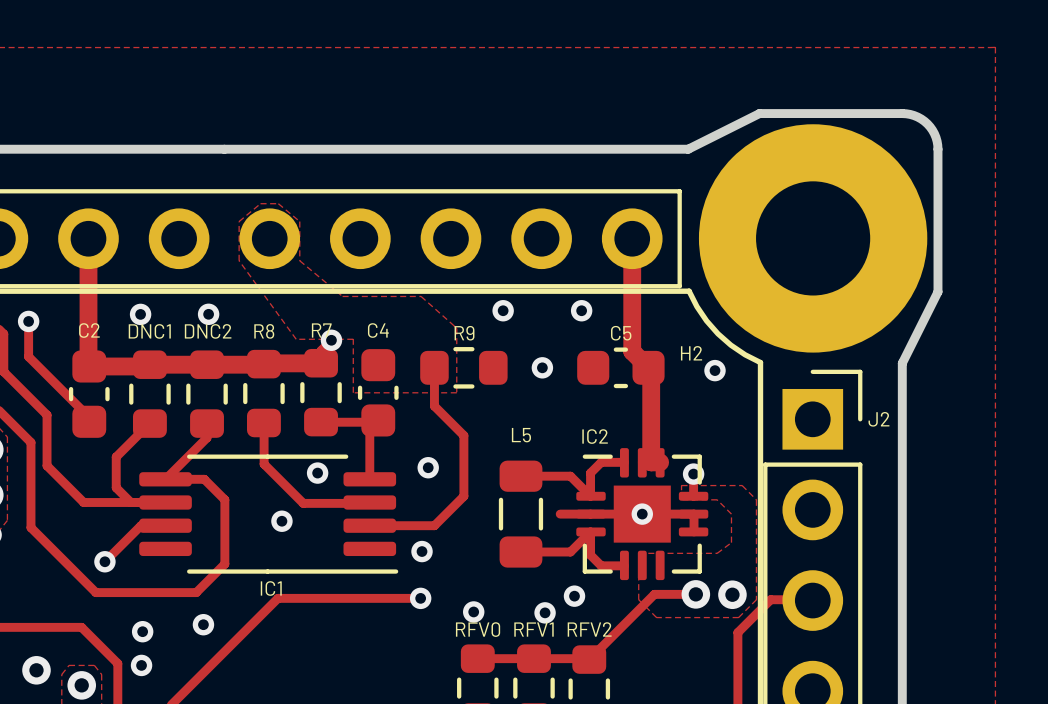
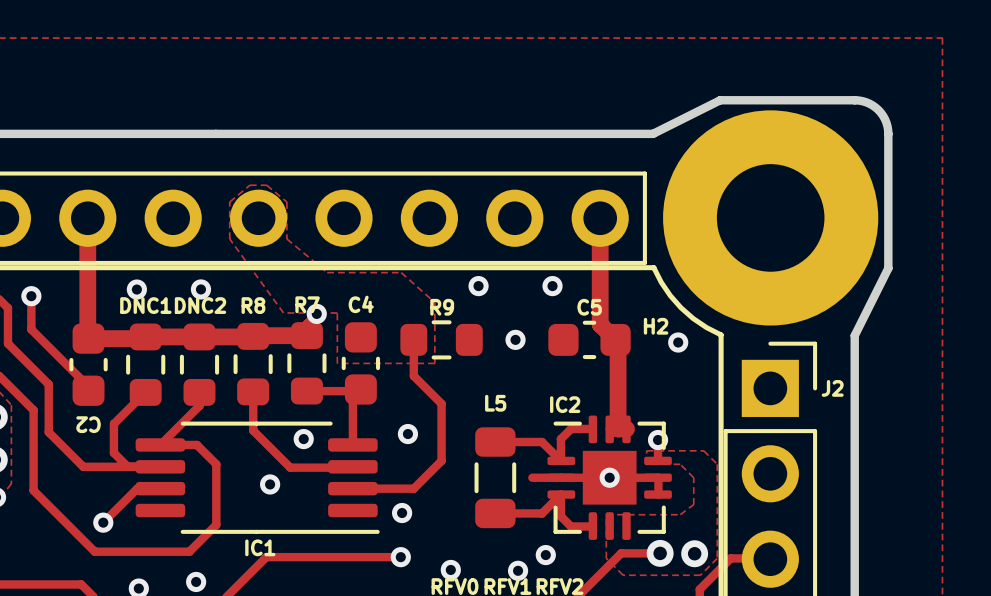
C2 name rotation: 0° (89, 330) -> 180° (88, 424)
C2 name position: C2 (89, 330) -> C2 (88, 424)

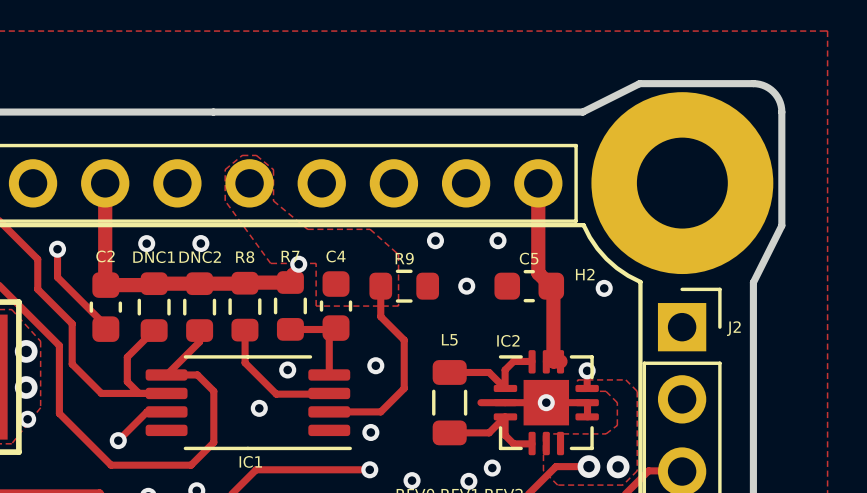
C2 name rotation: 0° (88, 424) -> 180° (105, 256)
C2 name position: C2 (88, 424) -> C2 (105, 256)

